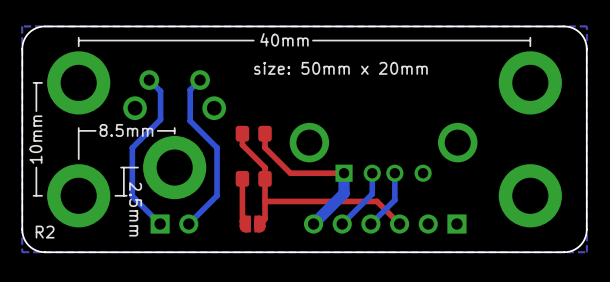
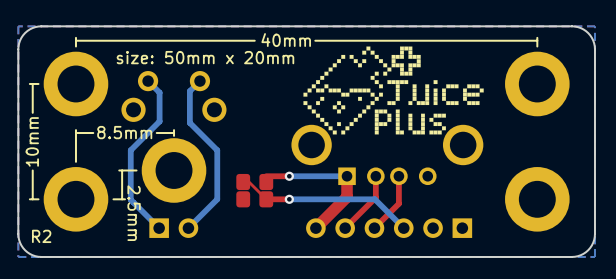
drawing: none -> [303, 46, 484, 135]
text position: size: 50mm x 20mm (340, 68) -> size: 50mm x 20mm (205, 57)
top track: (242, 133) (242, 144) (265, 167) (265, 218) (259, 224) -> none
part position: (253, 133) -> (254, 199)
top track: (265, 133) (265, 147) (290, 173) (344, 173) -> (315, 228) (347, 197) (347, 176)
top track: none -> (243, 176) (266, 199) (289, 199)
top track: none -> (289, 176) (266, 176)
via: none -> (289, 176)
bottom track: (344, 173) (344, 193) (313, 224) -> (347, 176) (289, 176)
bottom track: (372, 173) (372, 193) (342, 224) -> none
top track: none -> (375, 176) (375, 197) (345, 228)
bottom track: (394, 173) (394, 200) (370, 224) -> none
top track: none -> (398, 176) (398, 203) (374, 228)
top track: (242, 178) (242, 221) (245, 224) -> none
bottom track: none -> (289, 199) (374, 199) (403, 228)
via: none -> (289, 199)
top track: (265, 201) (377, 201) (399, 224) -> none
part: (252, 224) -> none

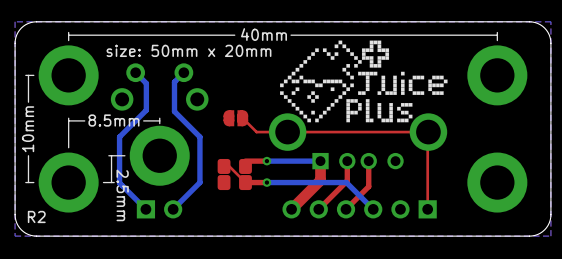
part: none -> (235, 118)
top track: none -> (242, 118) (256, 132) (428, 132) (427, 209)

